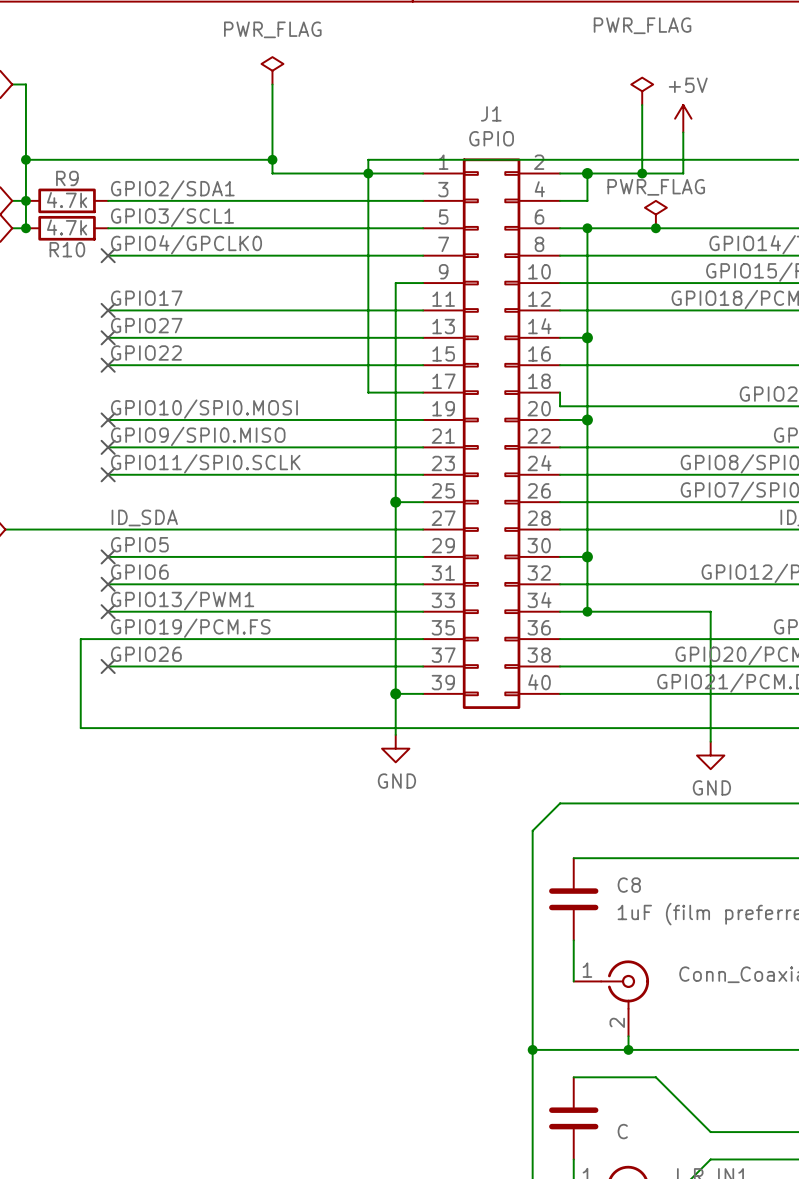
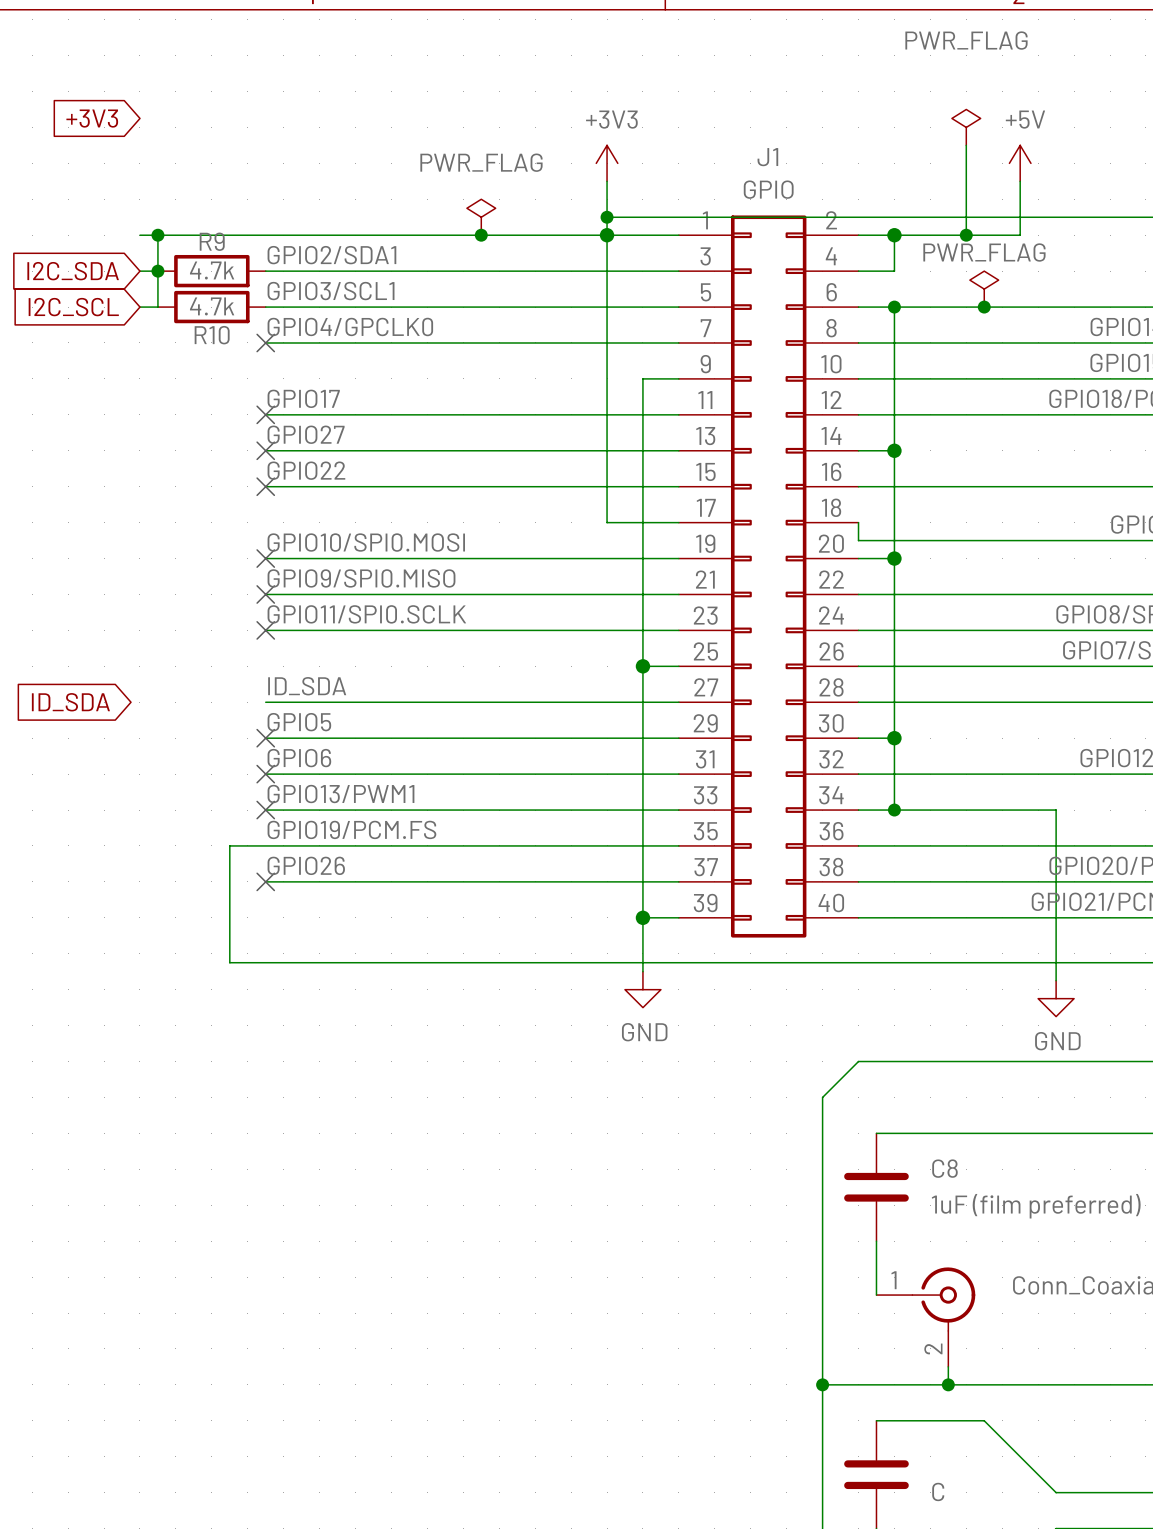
power symbol position: PWR_FLAG (272, 70) -> PWR_FLAG (481, 217)
wire: (12, 84) (25, 84) (25, 173) -> none
wire: (272, 84) (272, 173) -> (139, 235) (481, 235)
power symbol: none -> +3V3 (607, 163)
wire: none -> (607, 181) (607, 217)
wire: (25, 159) (272, 159) -> none
junction position: (25, 159) -> (157, 235)
junction position: (272, 159) -> (481, 235)
junction position: (368, 173) -> (607, 217)
junction: none -> (607, 235)
junction: (25, 228) -> none
wire: (5, 529) (108, 529) -> none

